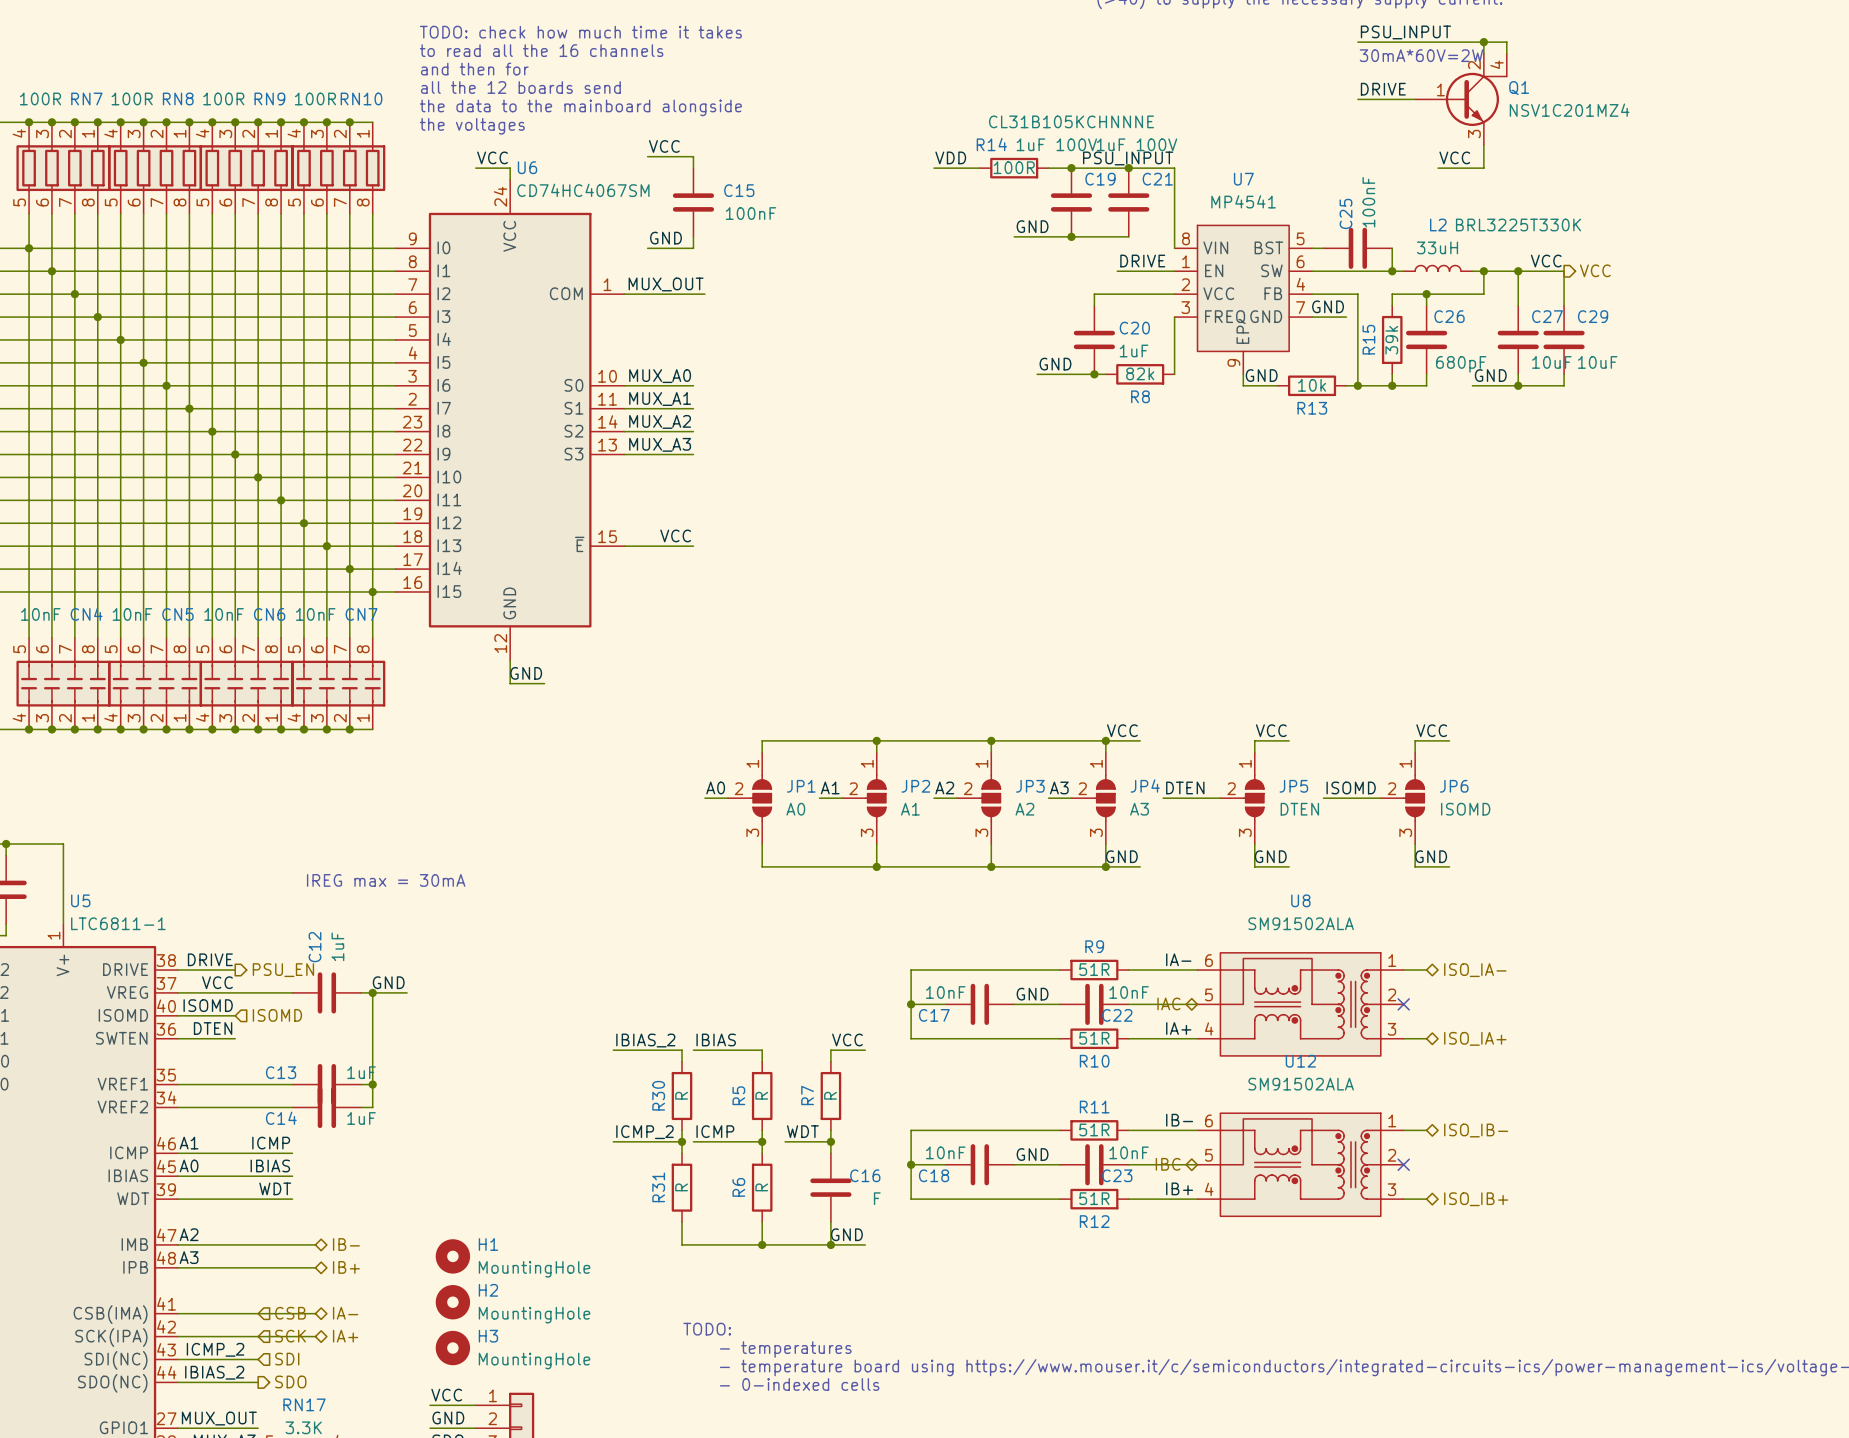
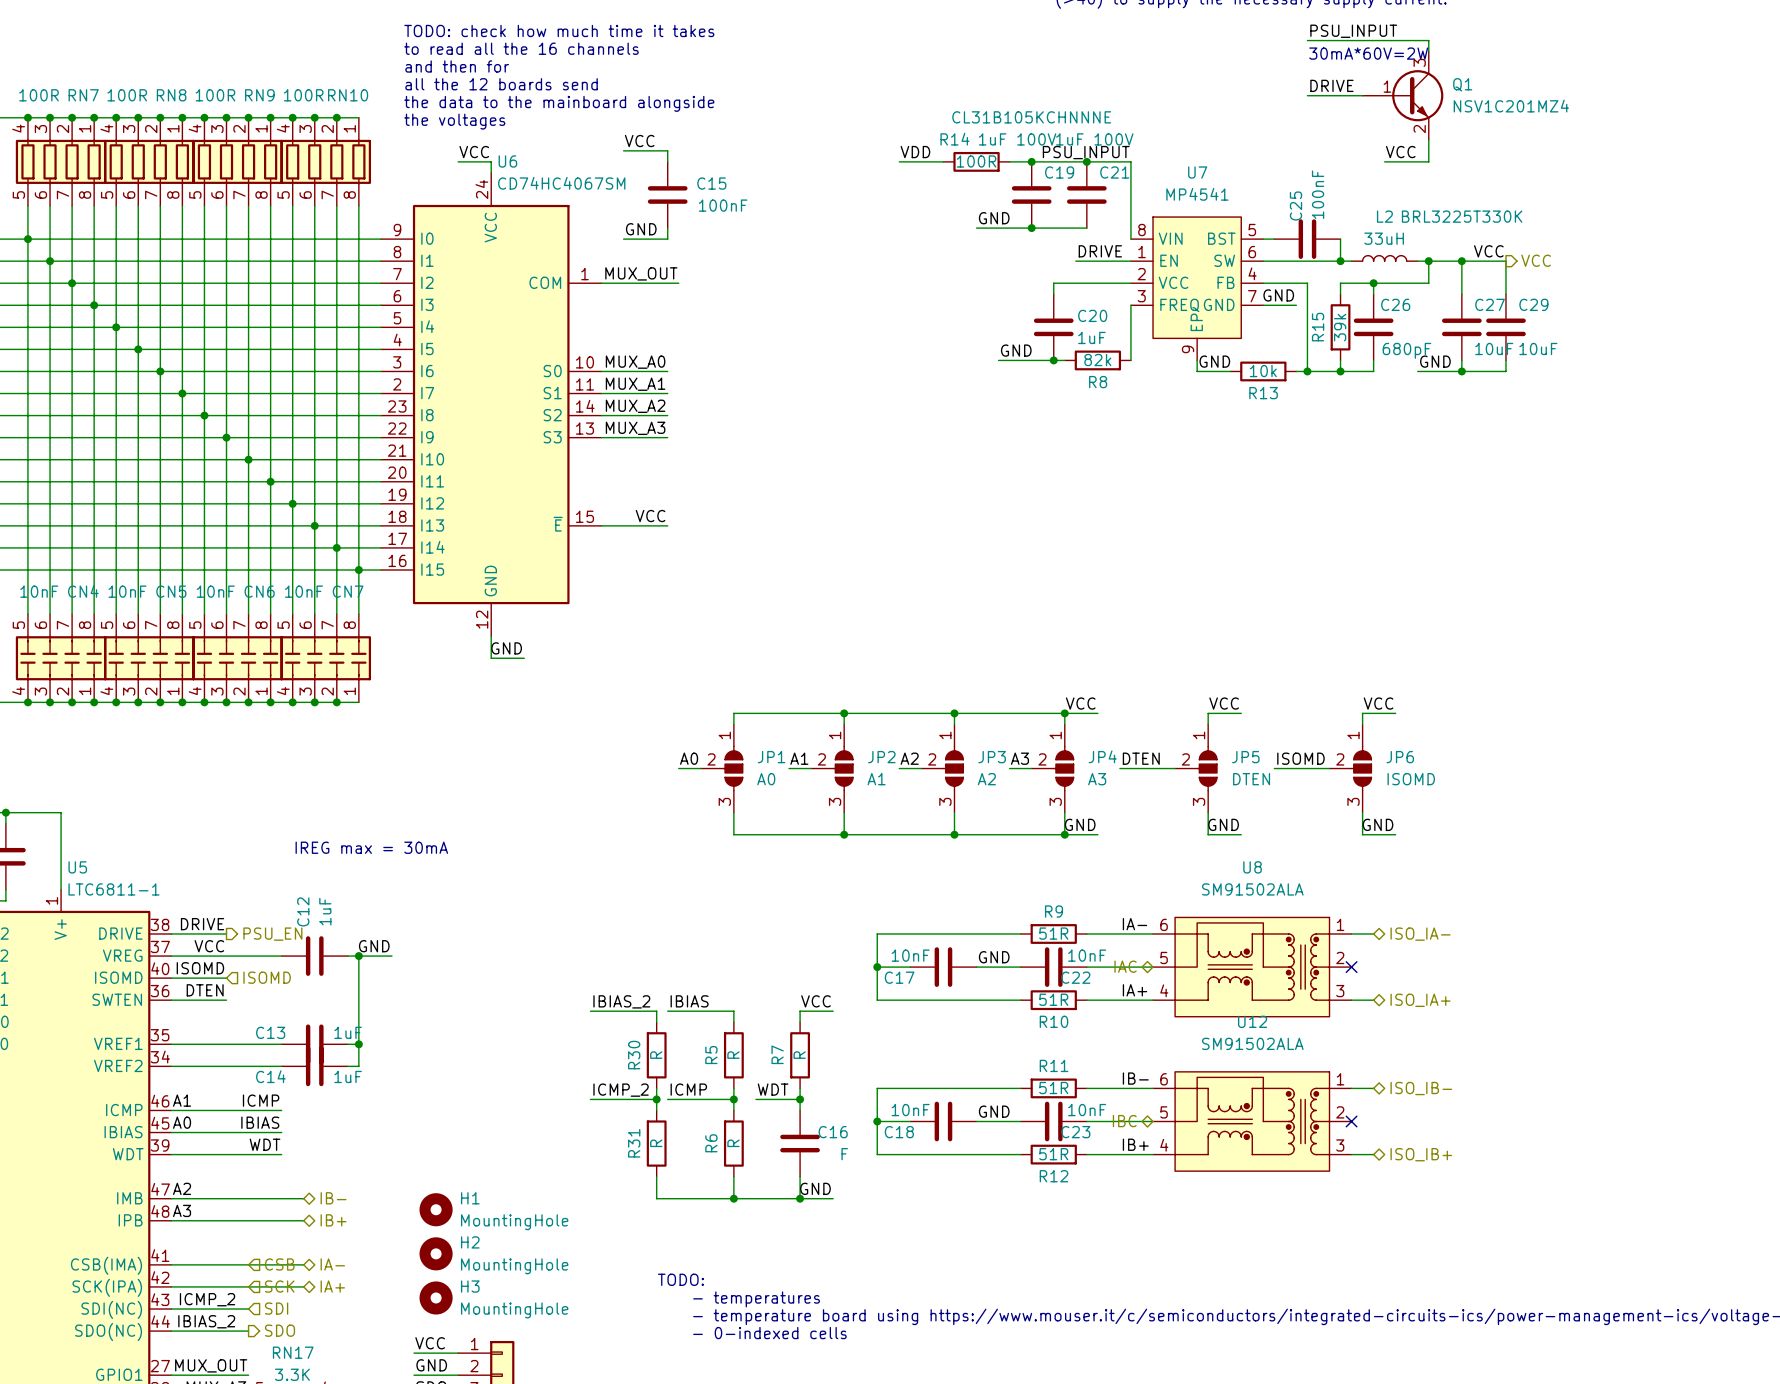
wire: (1483, 42) (1506, 42) (1506, 53) -> none
junction: (1483, 42) -> none
Q1 symbol: [1415, 53, 1507, 146] -> [1362, 51, 1444, 140]

